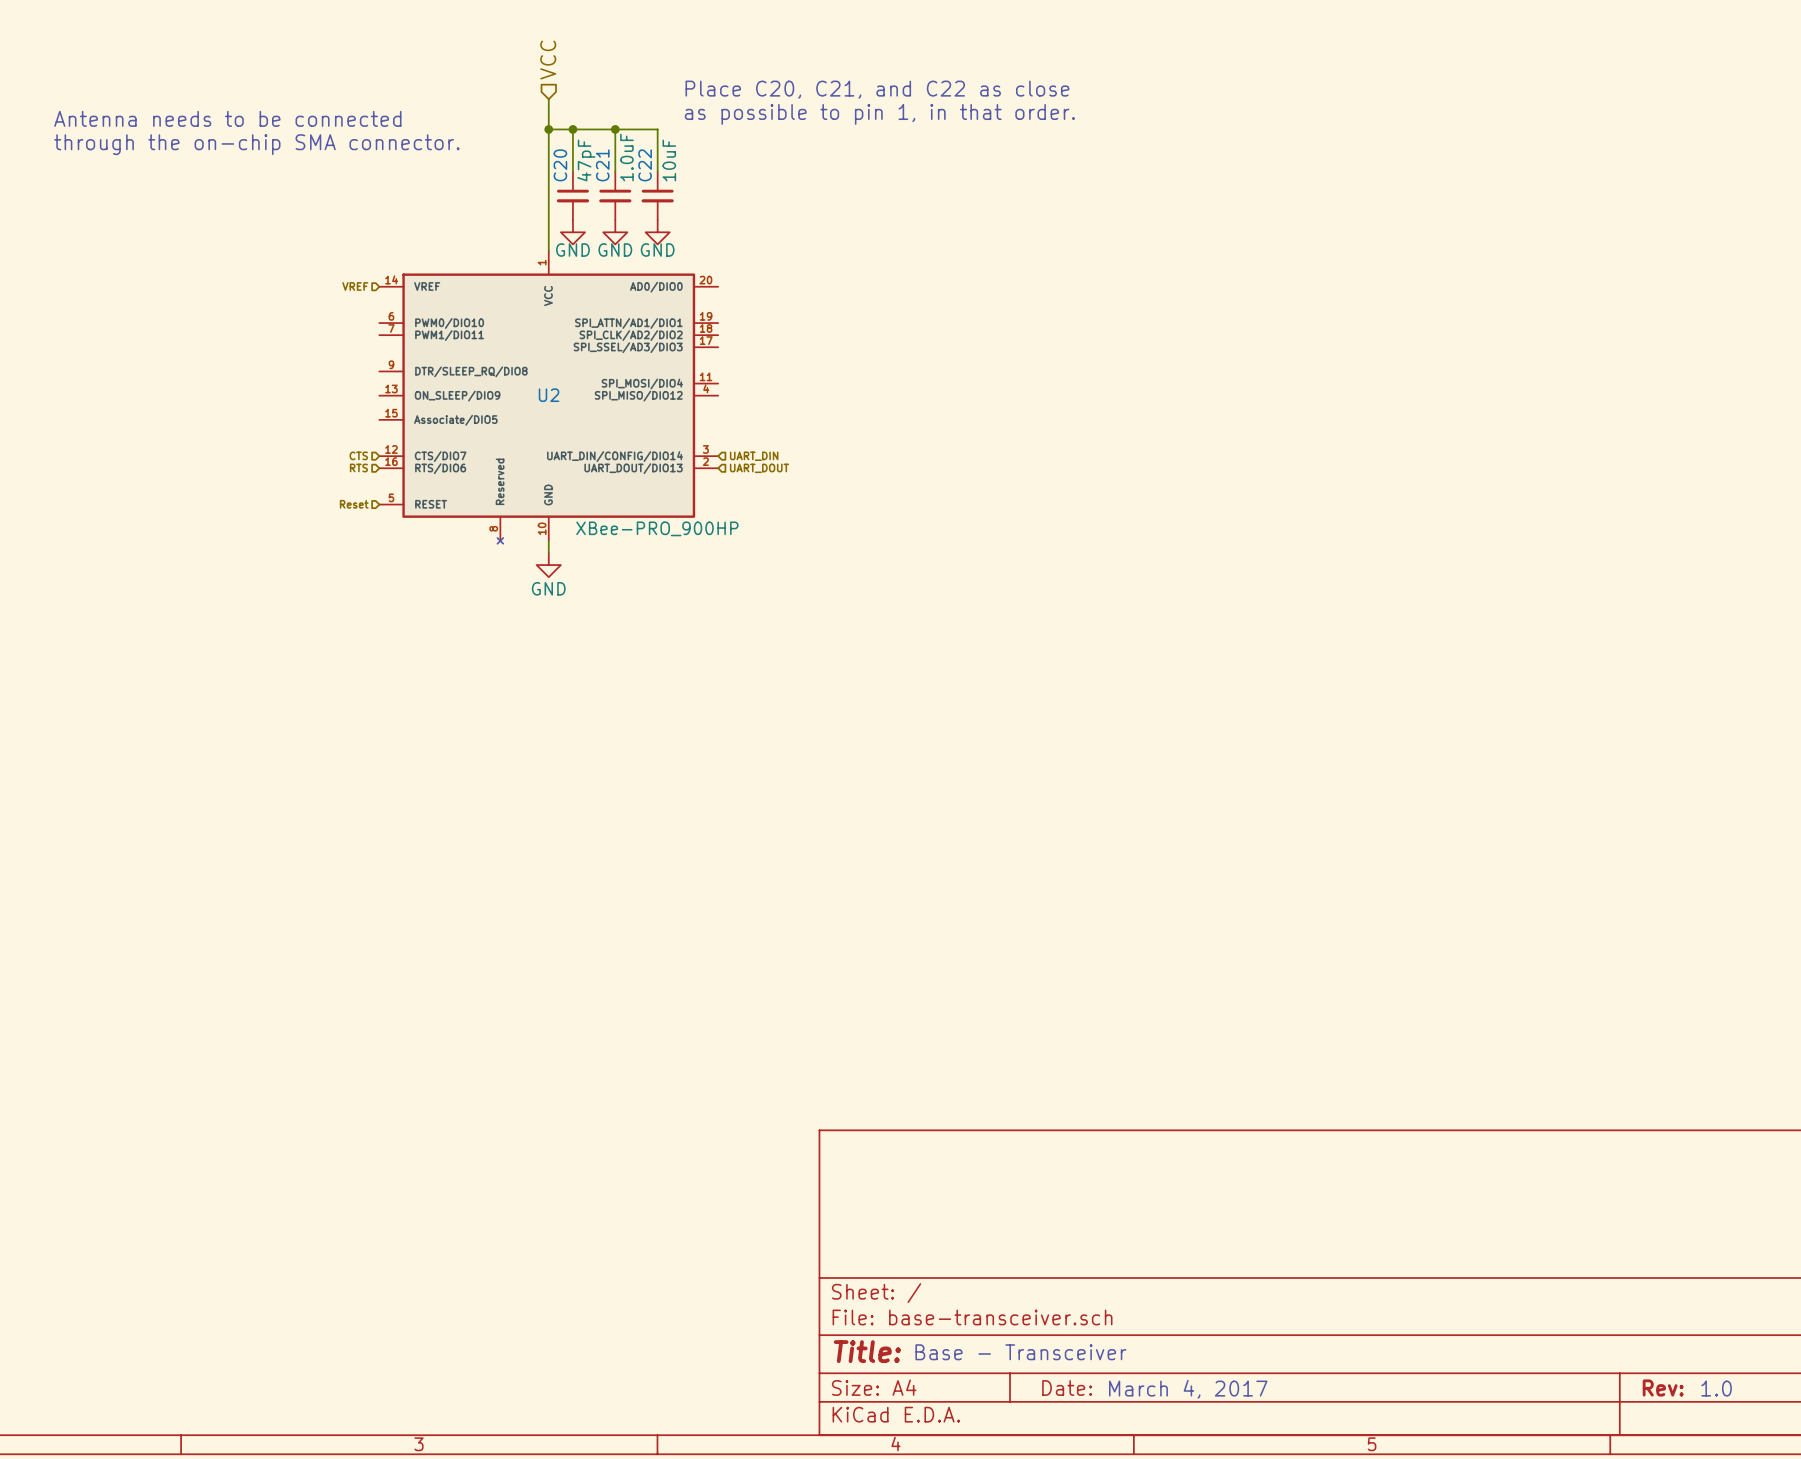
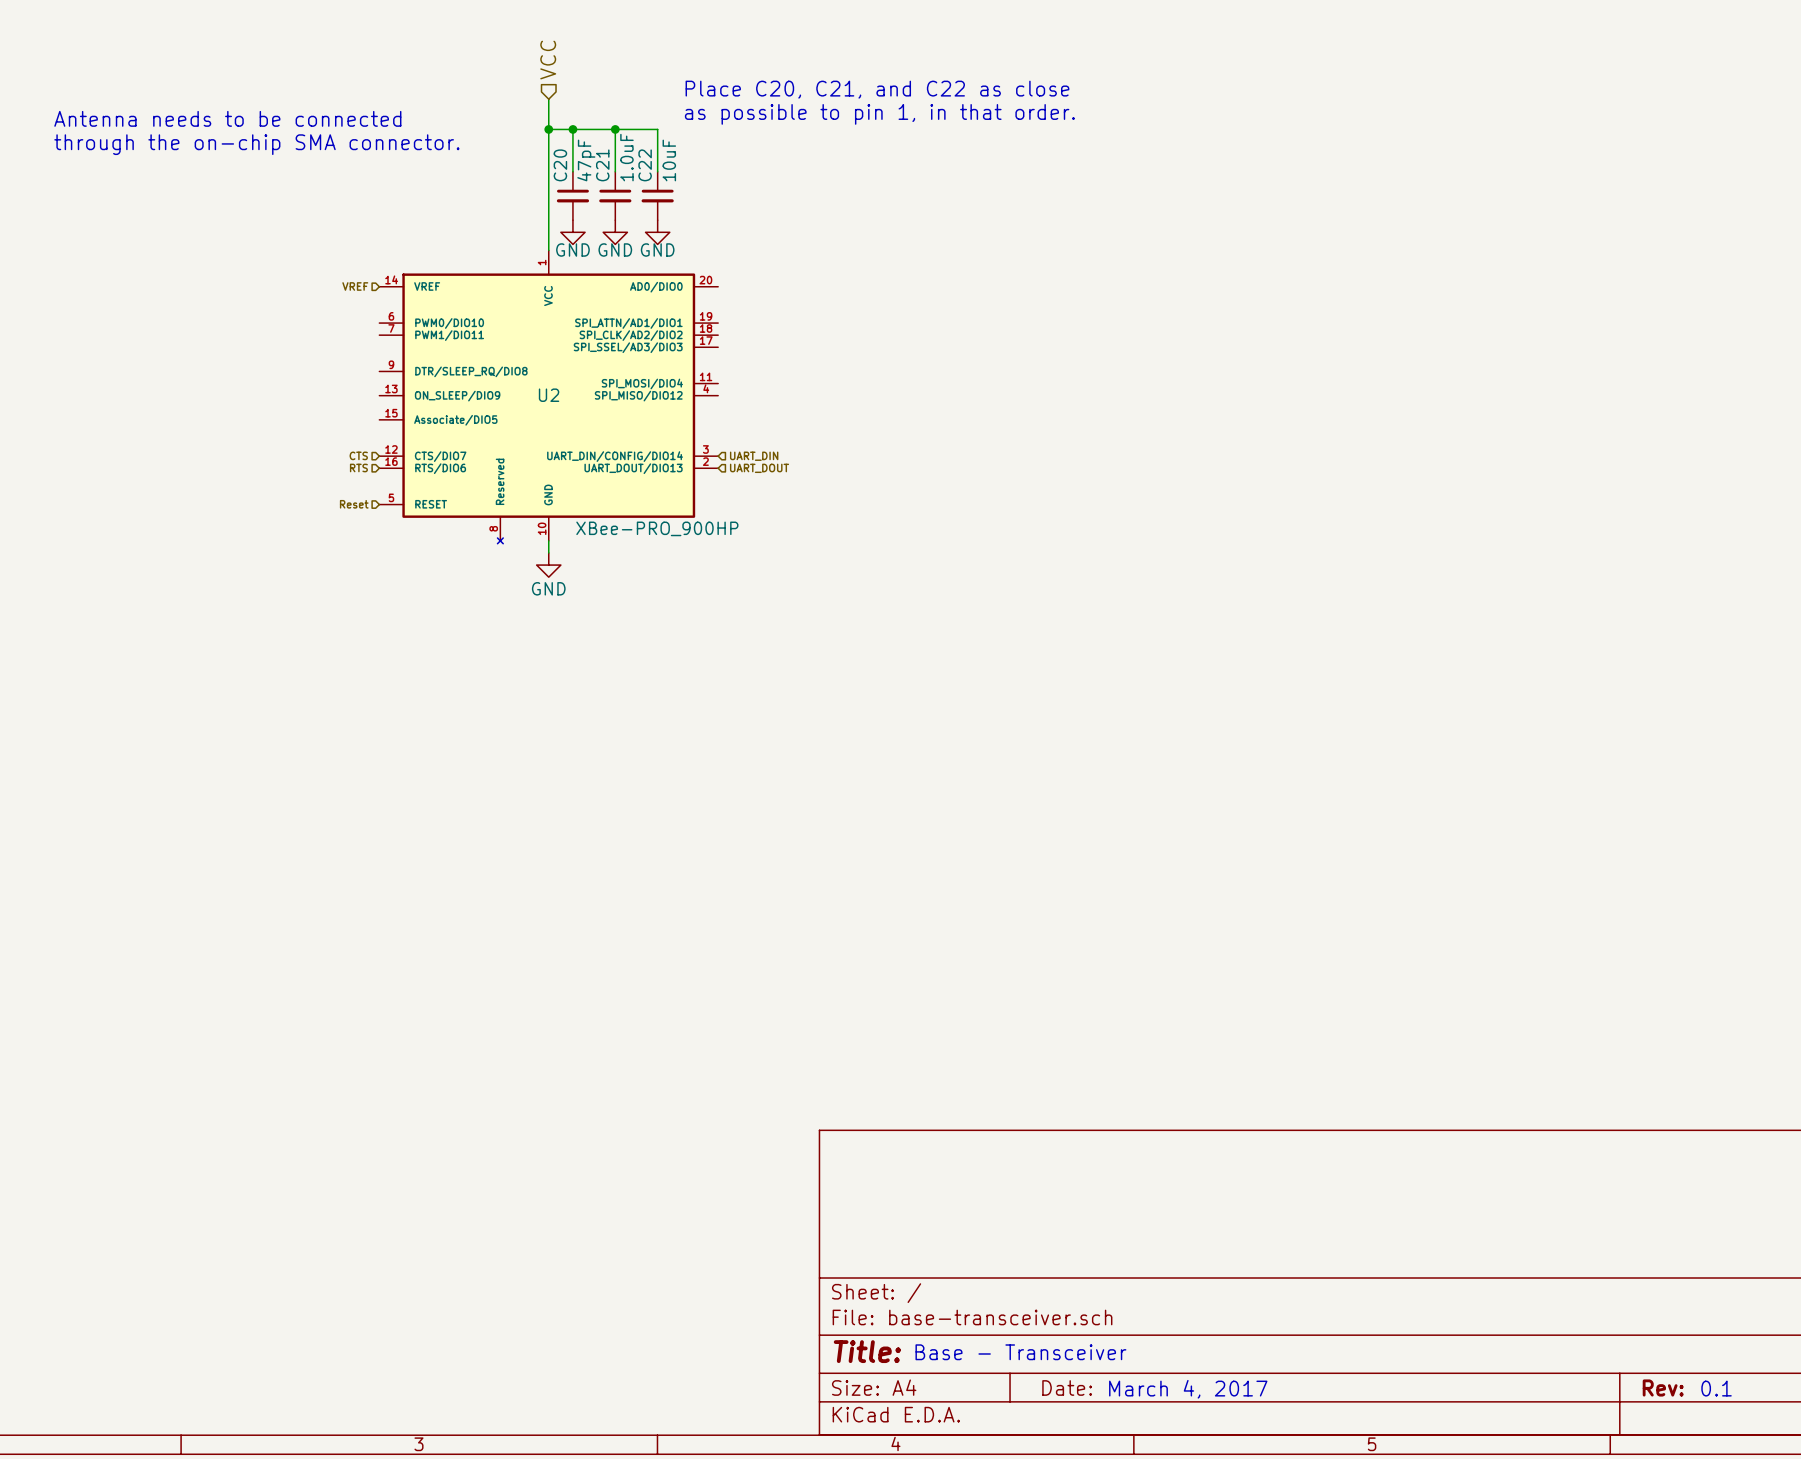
text: 1.0 (1716, 1388) -> 0.1 (1716, 1388)

